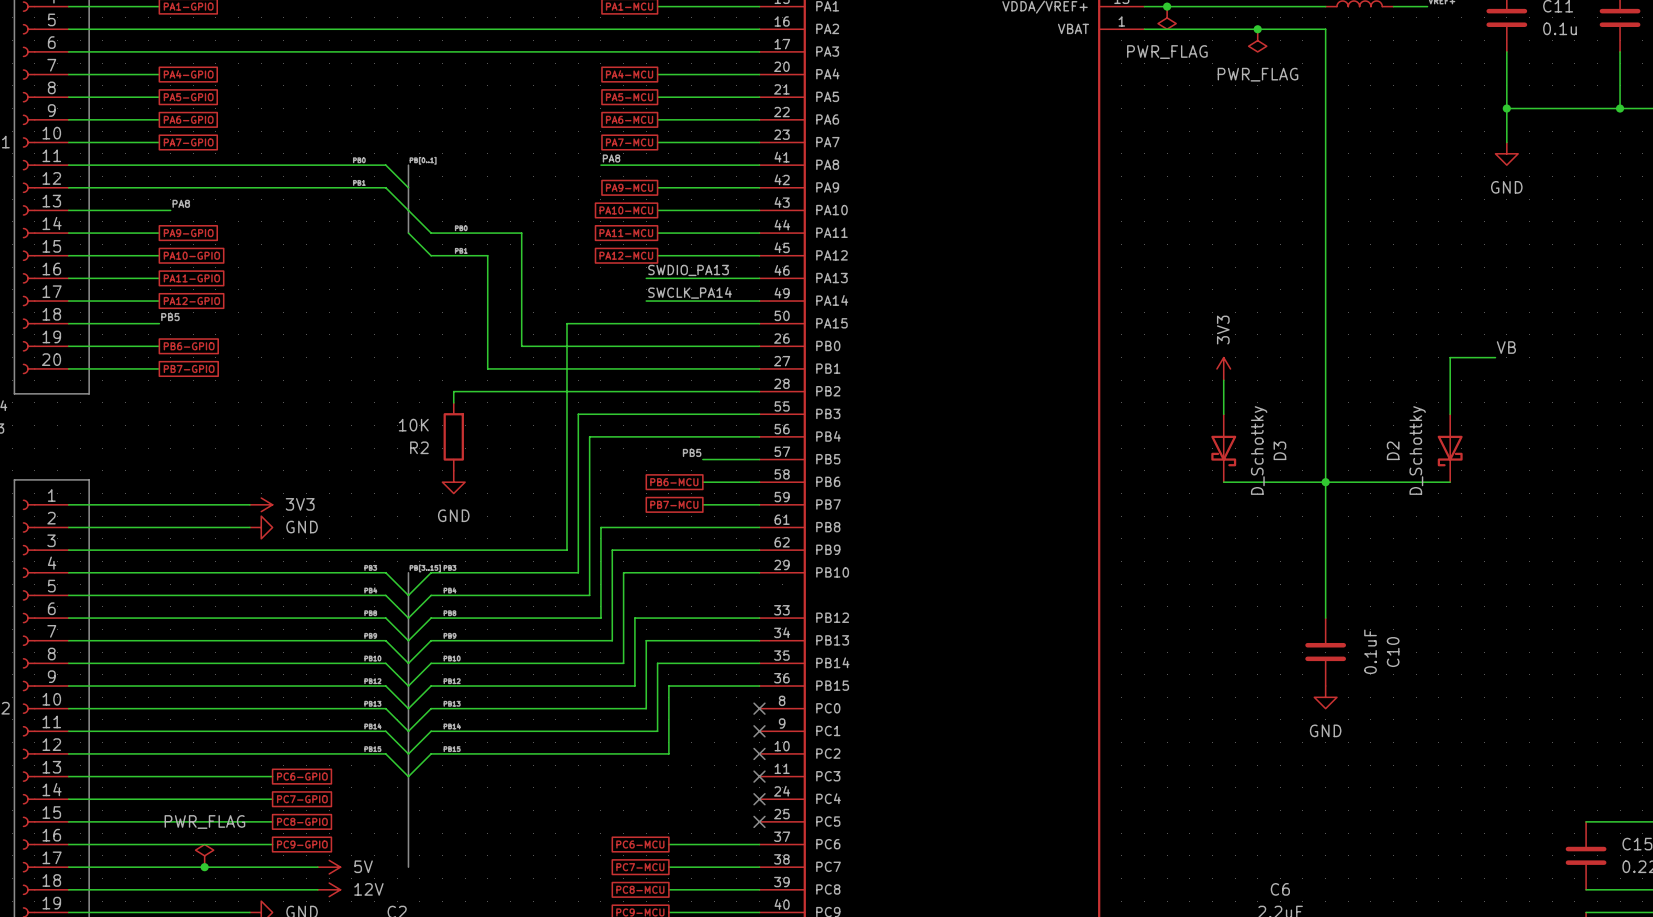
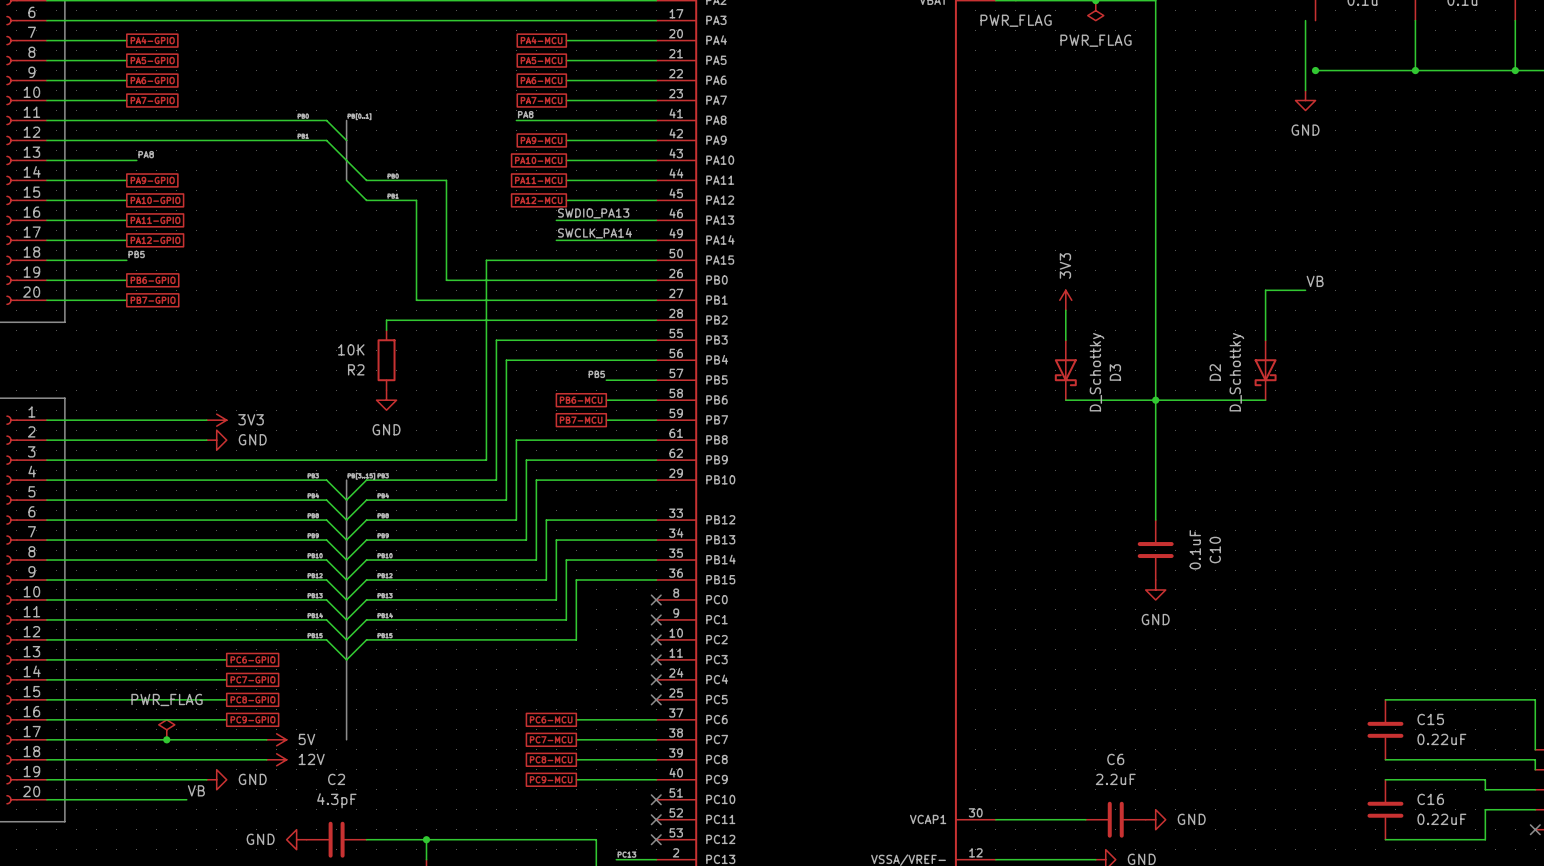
wire: none -> (1305, 20) (1305, 90)
wire: (1506, 51) (1506, 142) -> none
power symbol position: GND (1506, 153) -> GND (1305, 100)

